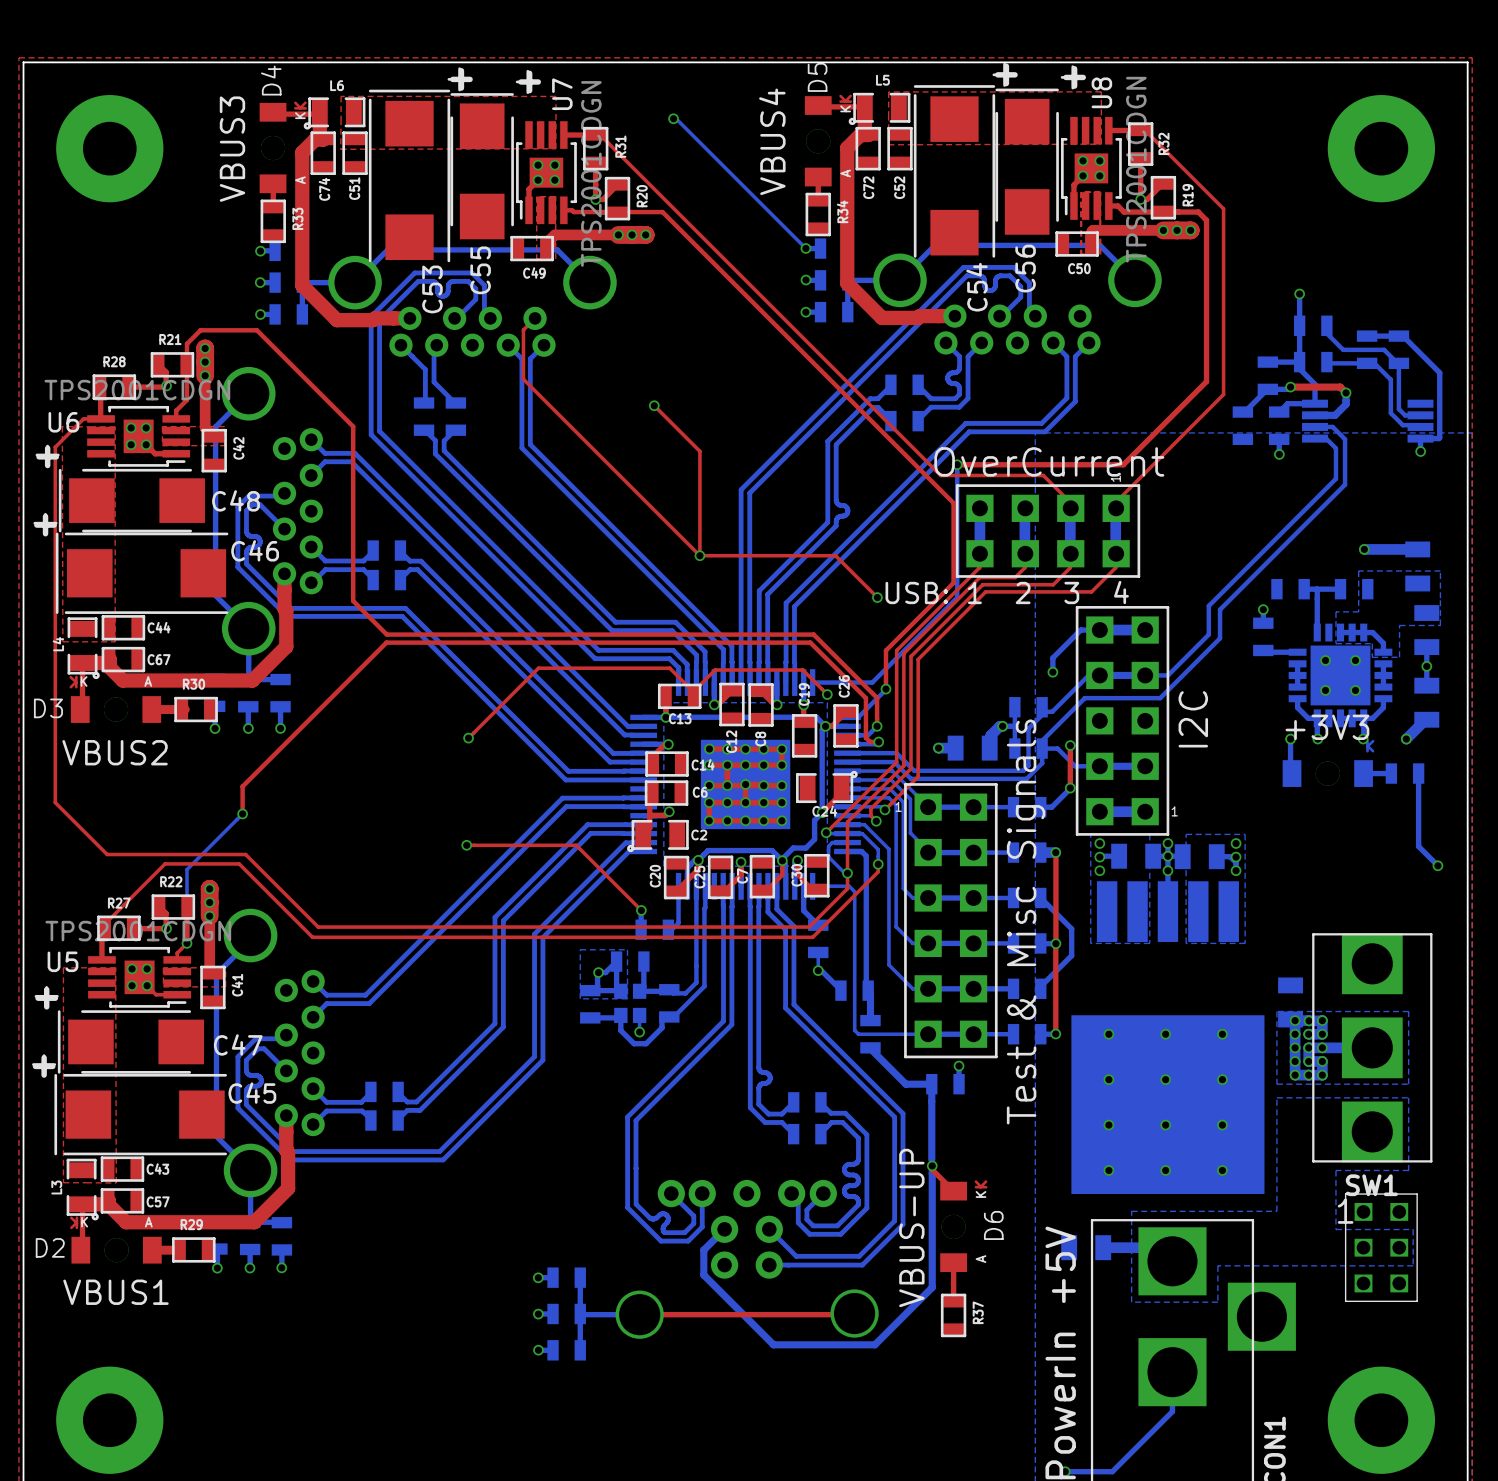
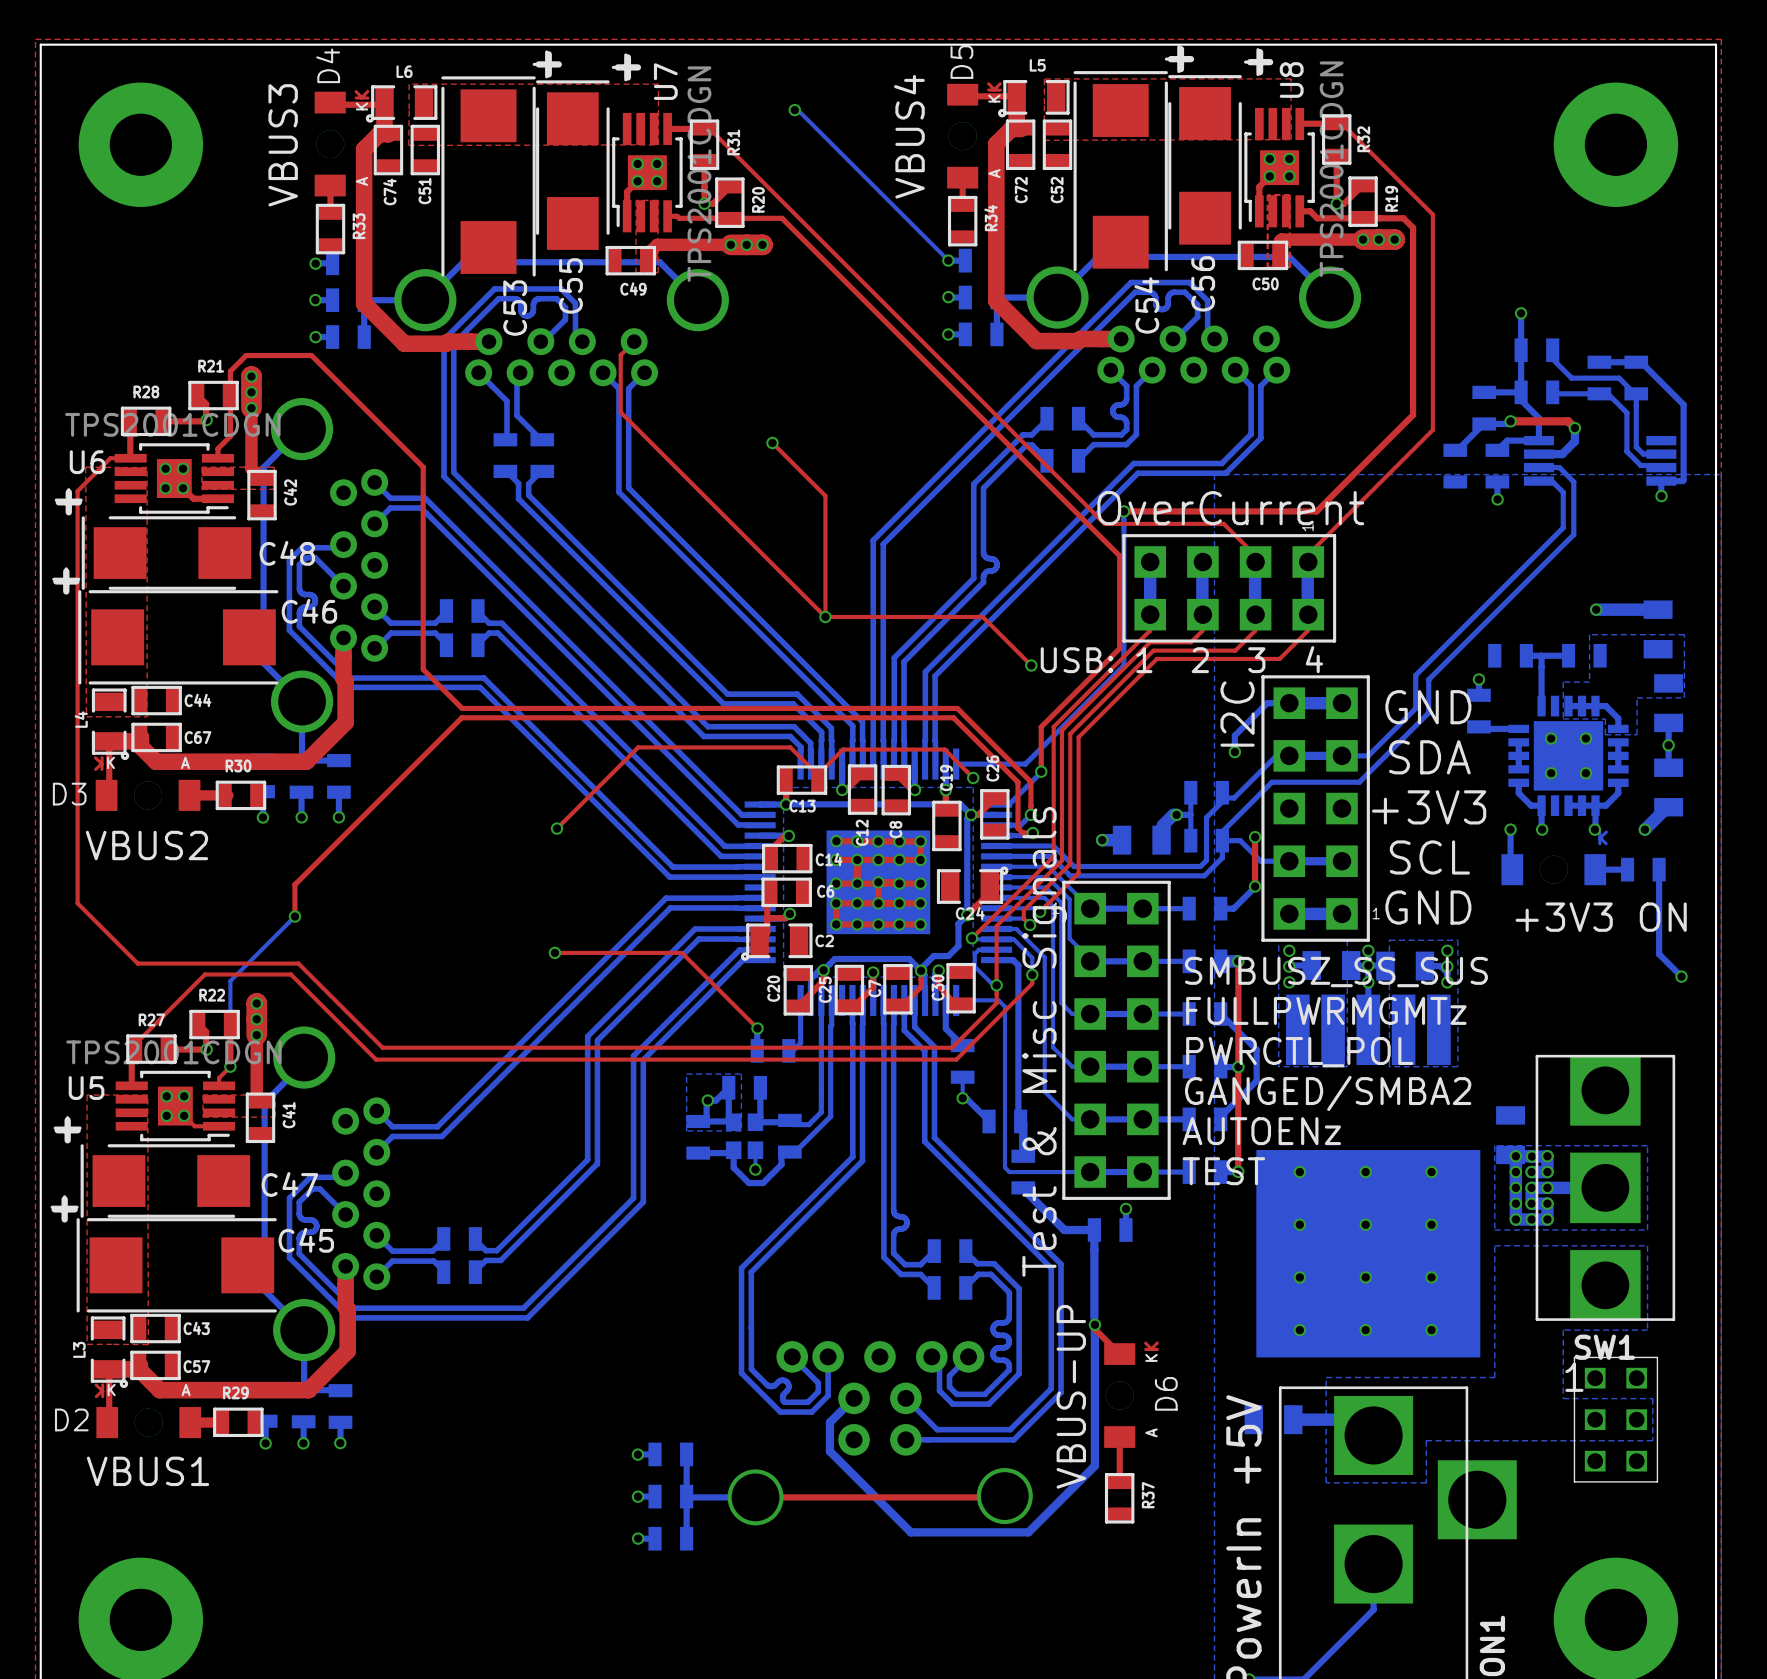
text: none -> GND (1428, 707)
text: none -> SDA (1429, 757)
part value position: I2C (1193, 719) -> I2C (1237, 714)
text: none -> +3V3 (1429, 807)
part value: +3V3 (1327, 727) -> +3V3 ON (1601, 917)
text: none -> SCL (1429, 857)
text: none -> GND (1428, 907)
text: none -> SMBUSZ_SS_SUS (1336, 972)
text: none -> FULLPWRMGMTz (1326, 1010)
part value position: Test & Misc Signals (1026, 921) -> Test & Misc Signals (1044, 1041)
text: none -> PWRCTL_POL (1299, 1052)
text: none -> GANGED/SMBA2 (1328, 1093)
text: none -> AUTOENz (1261, 1131)
text: none -> TEST (1223, 1171)

